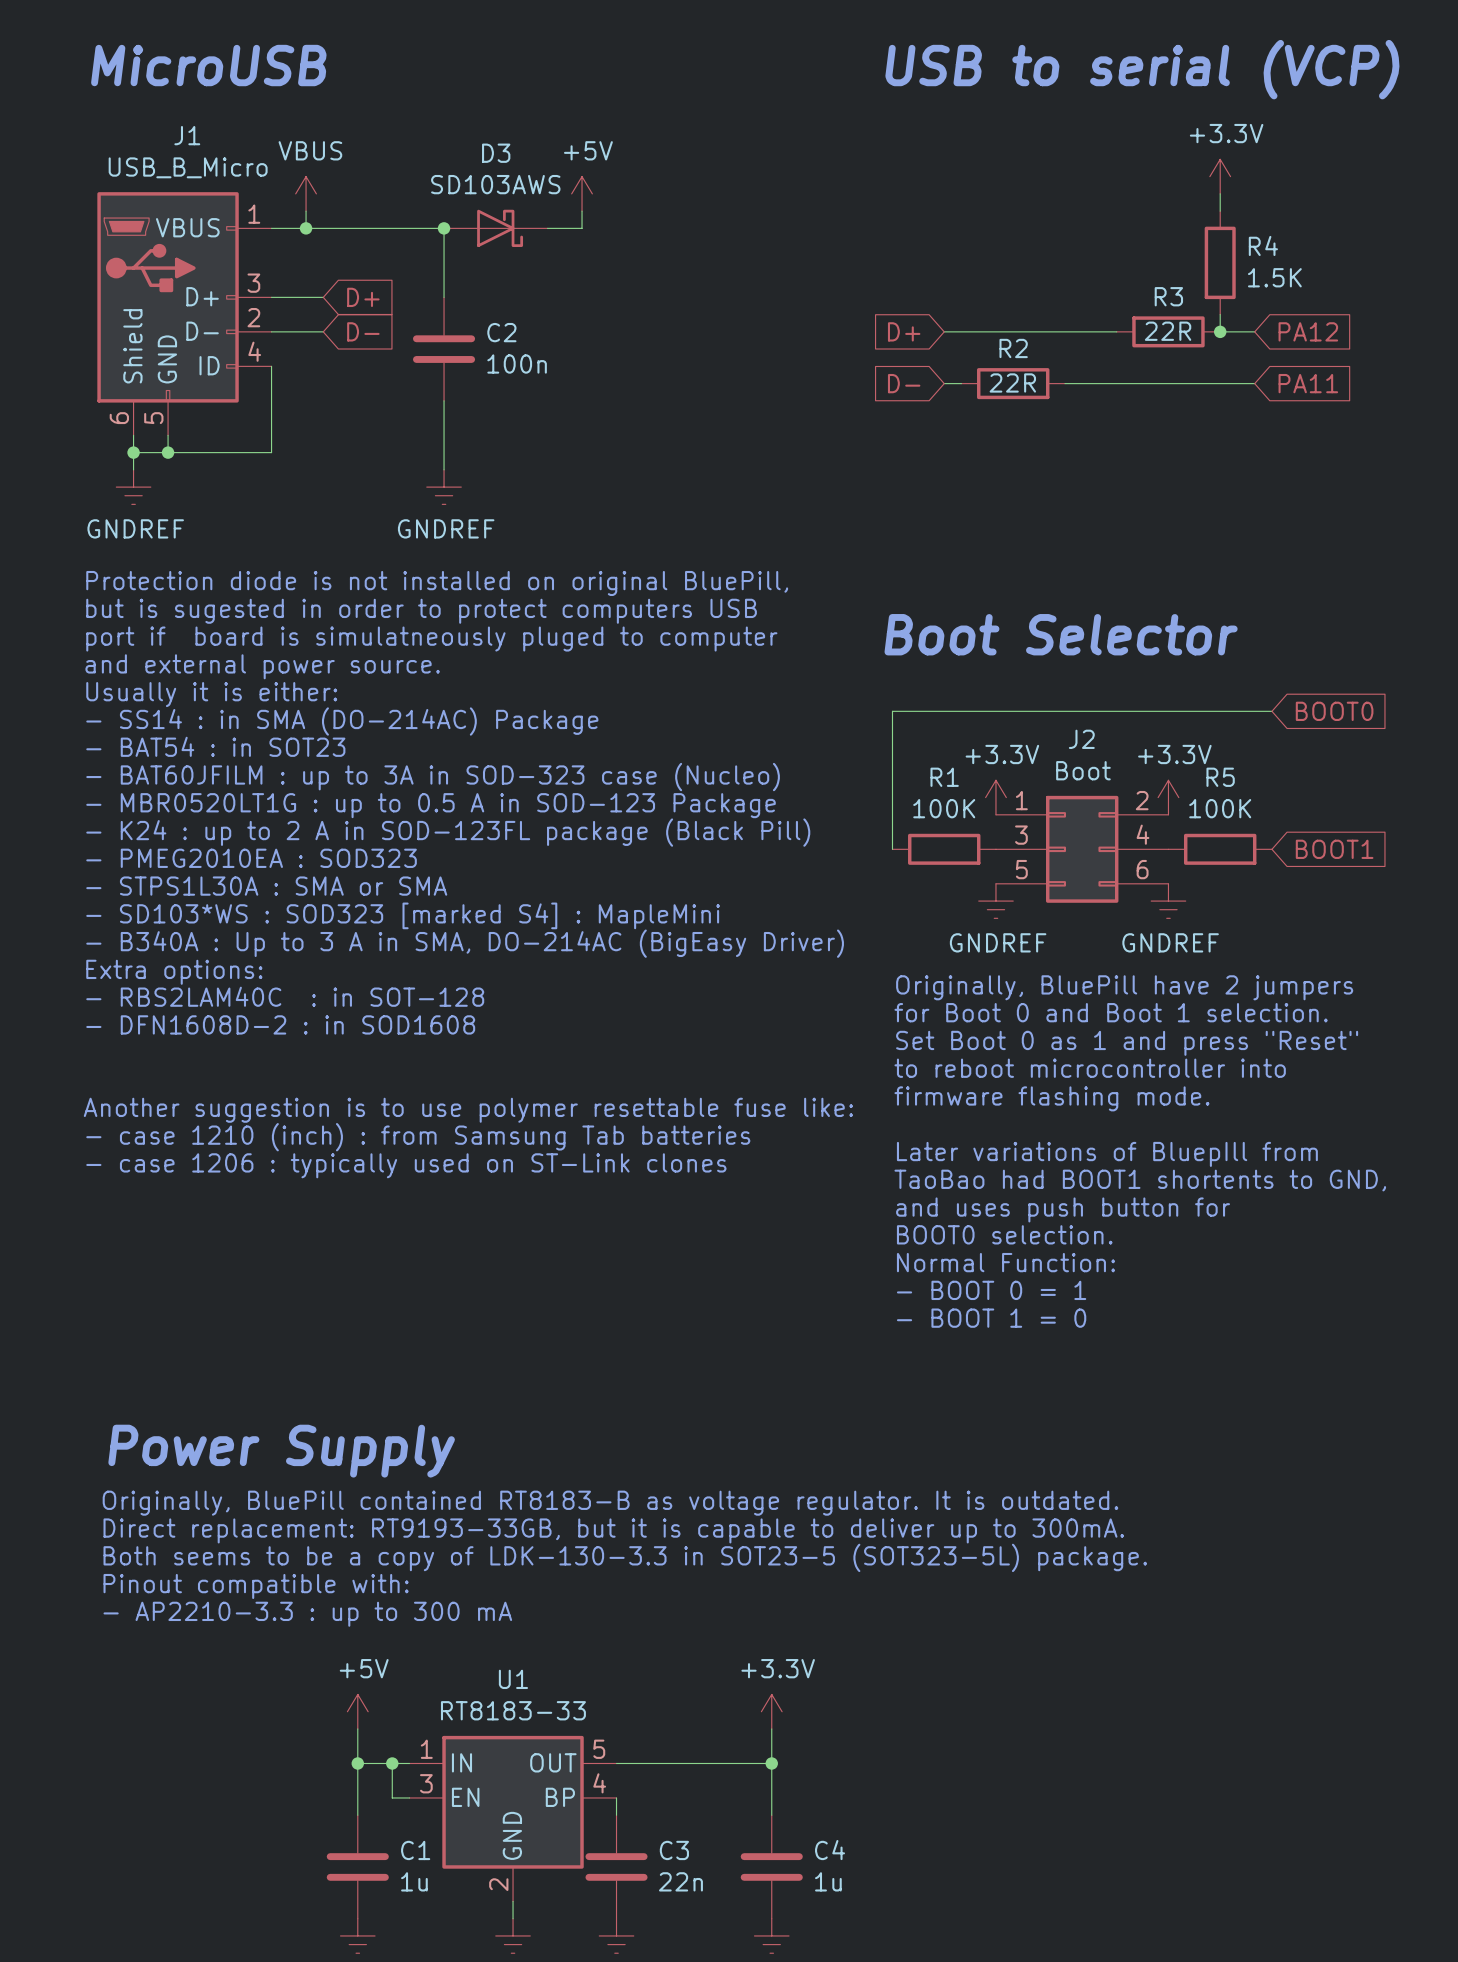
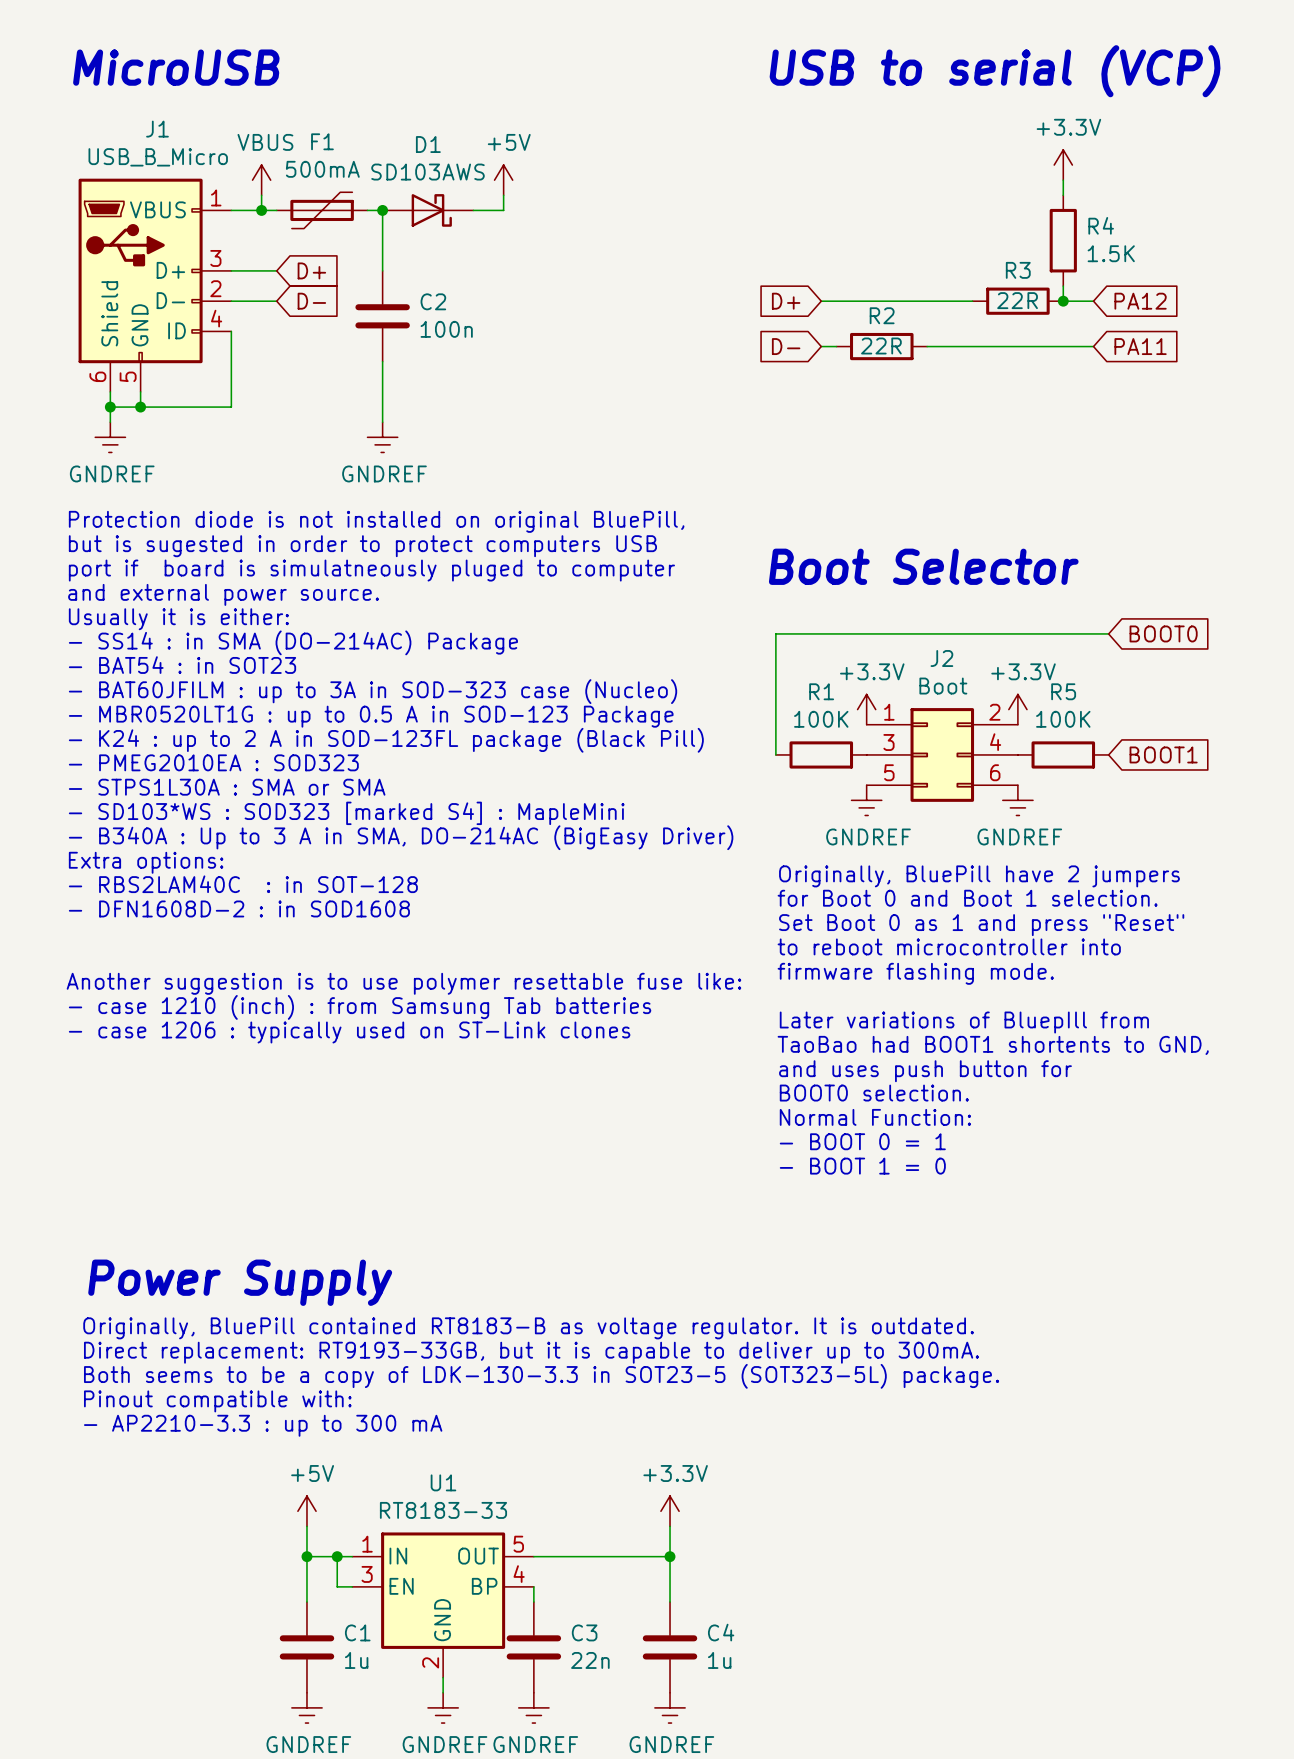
D3 name: D3 (496, 153) -> D1 (428, 144)
F1: none -> 500mA (322, 210)

